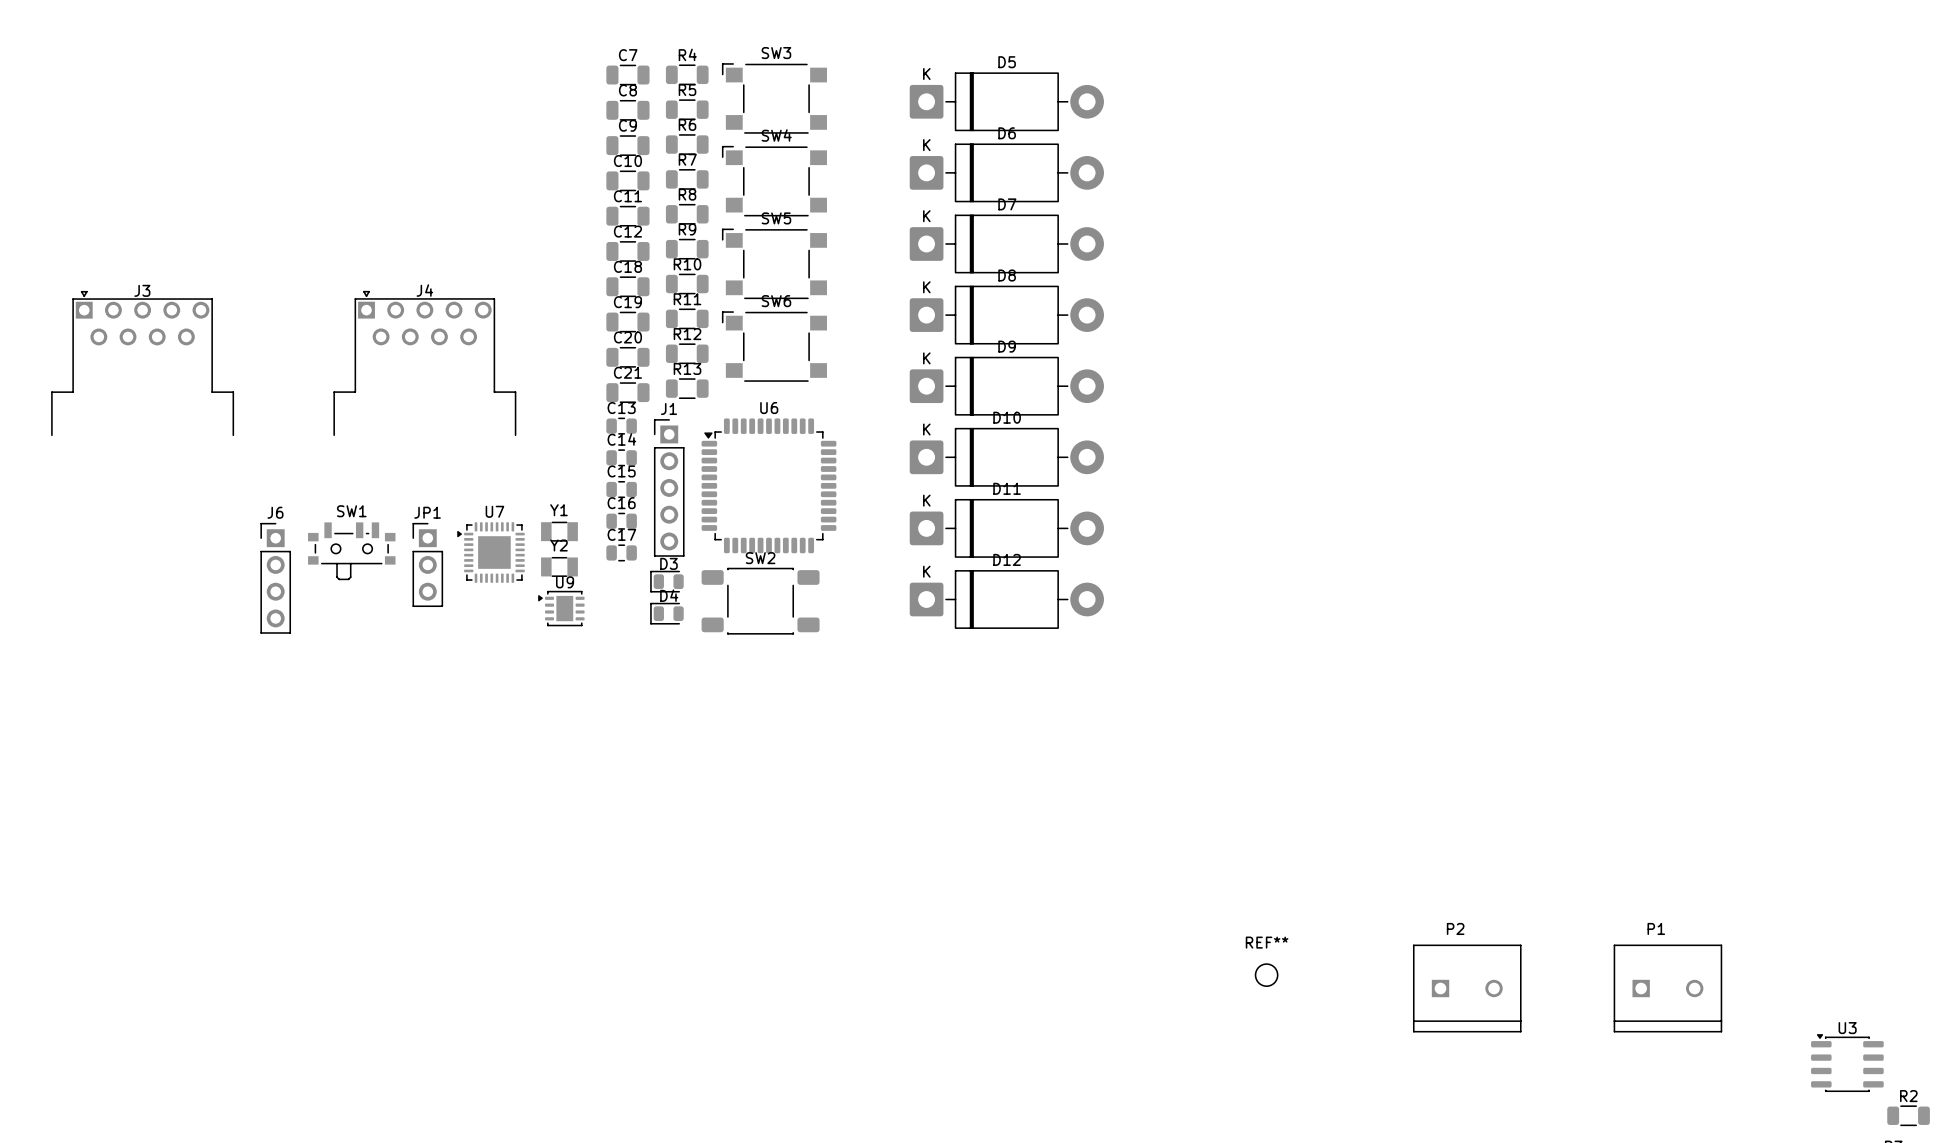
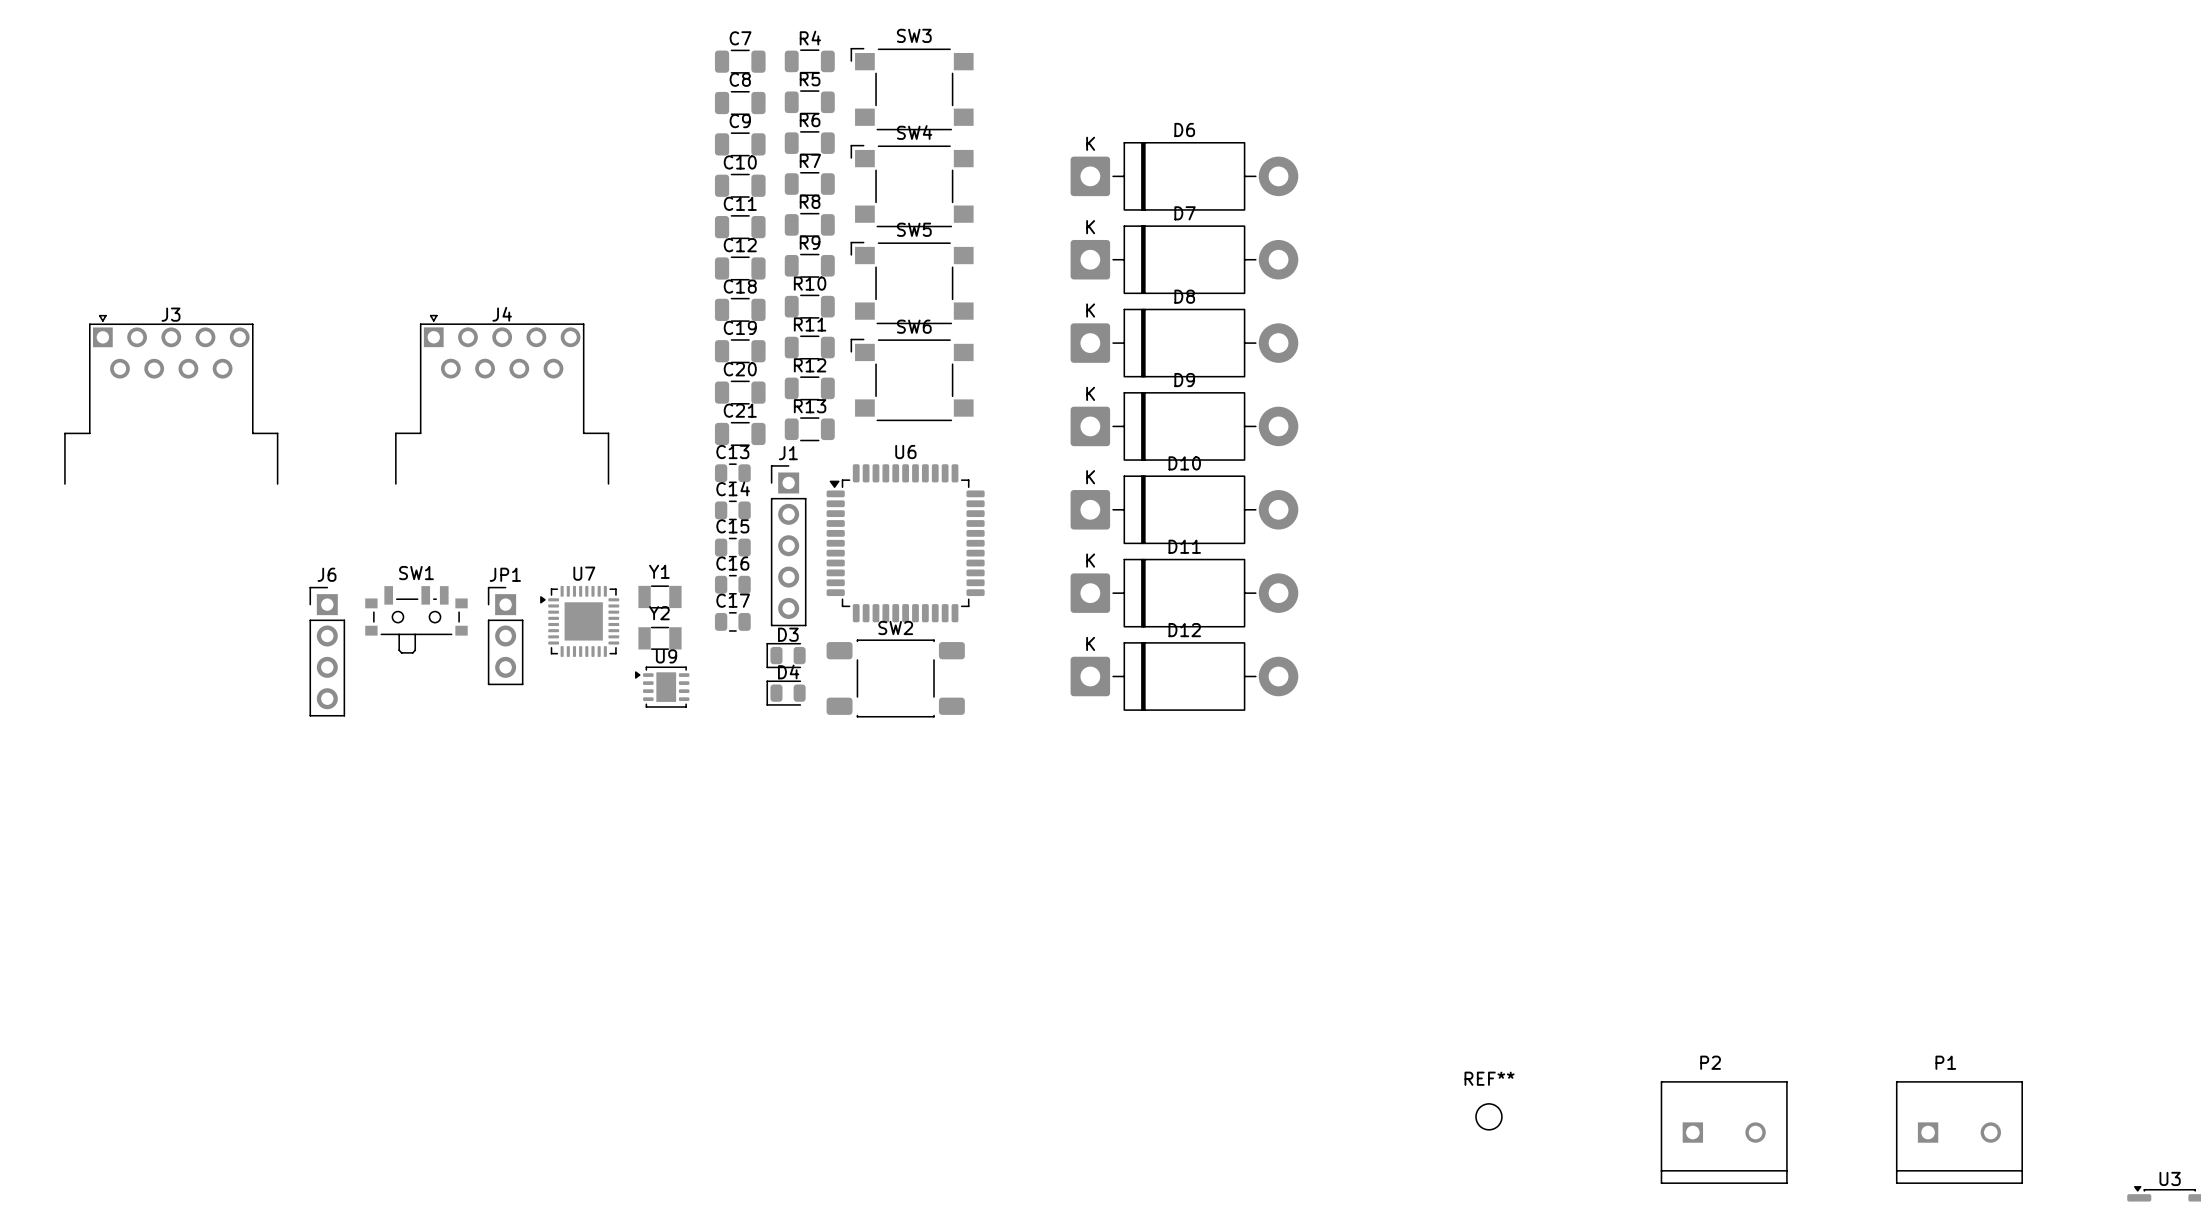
D5: (1006, 101) -> none

